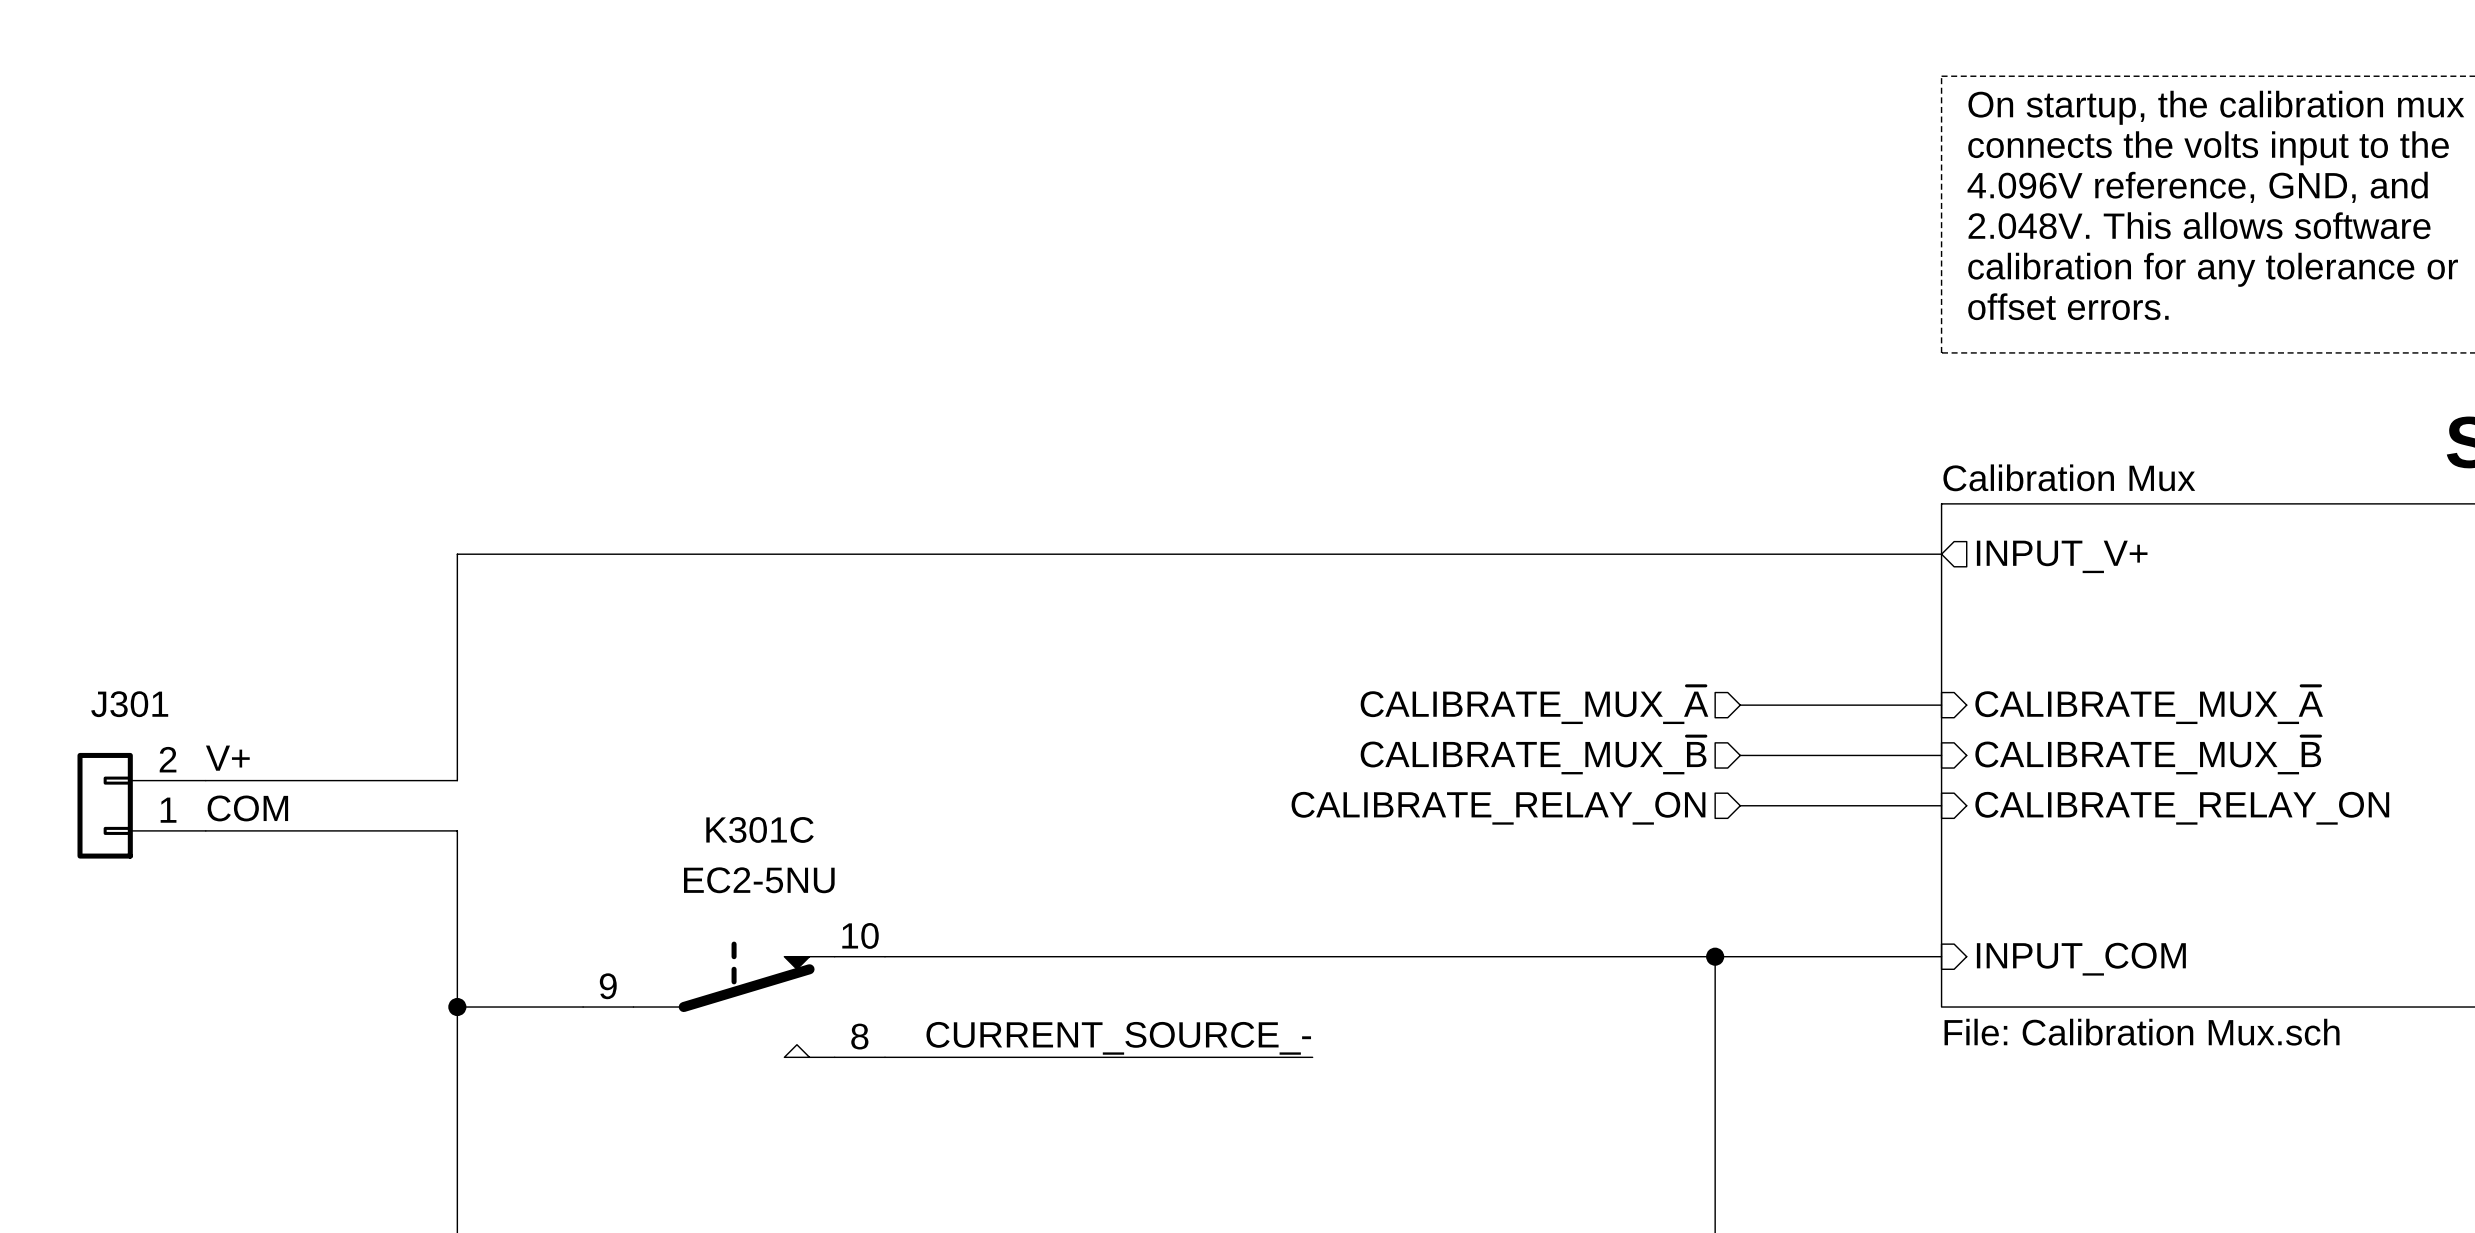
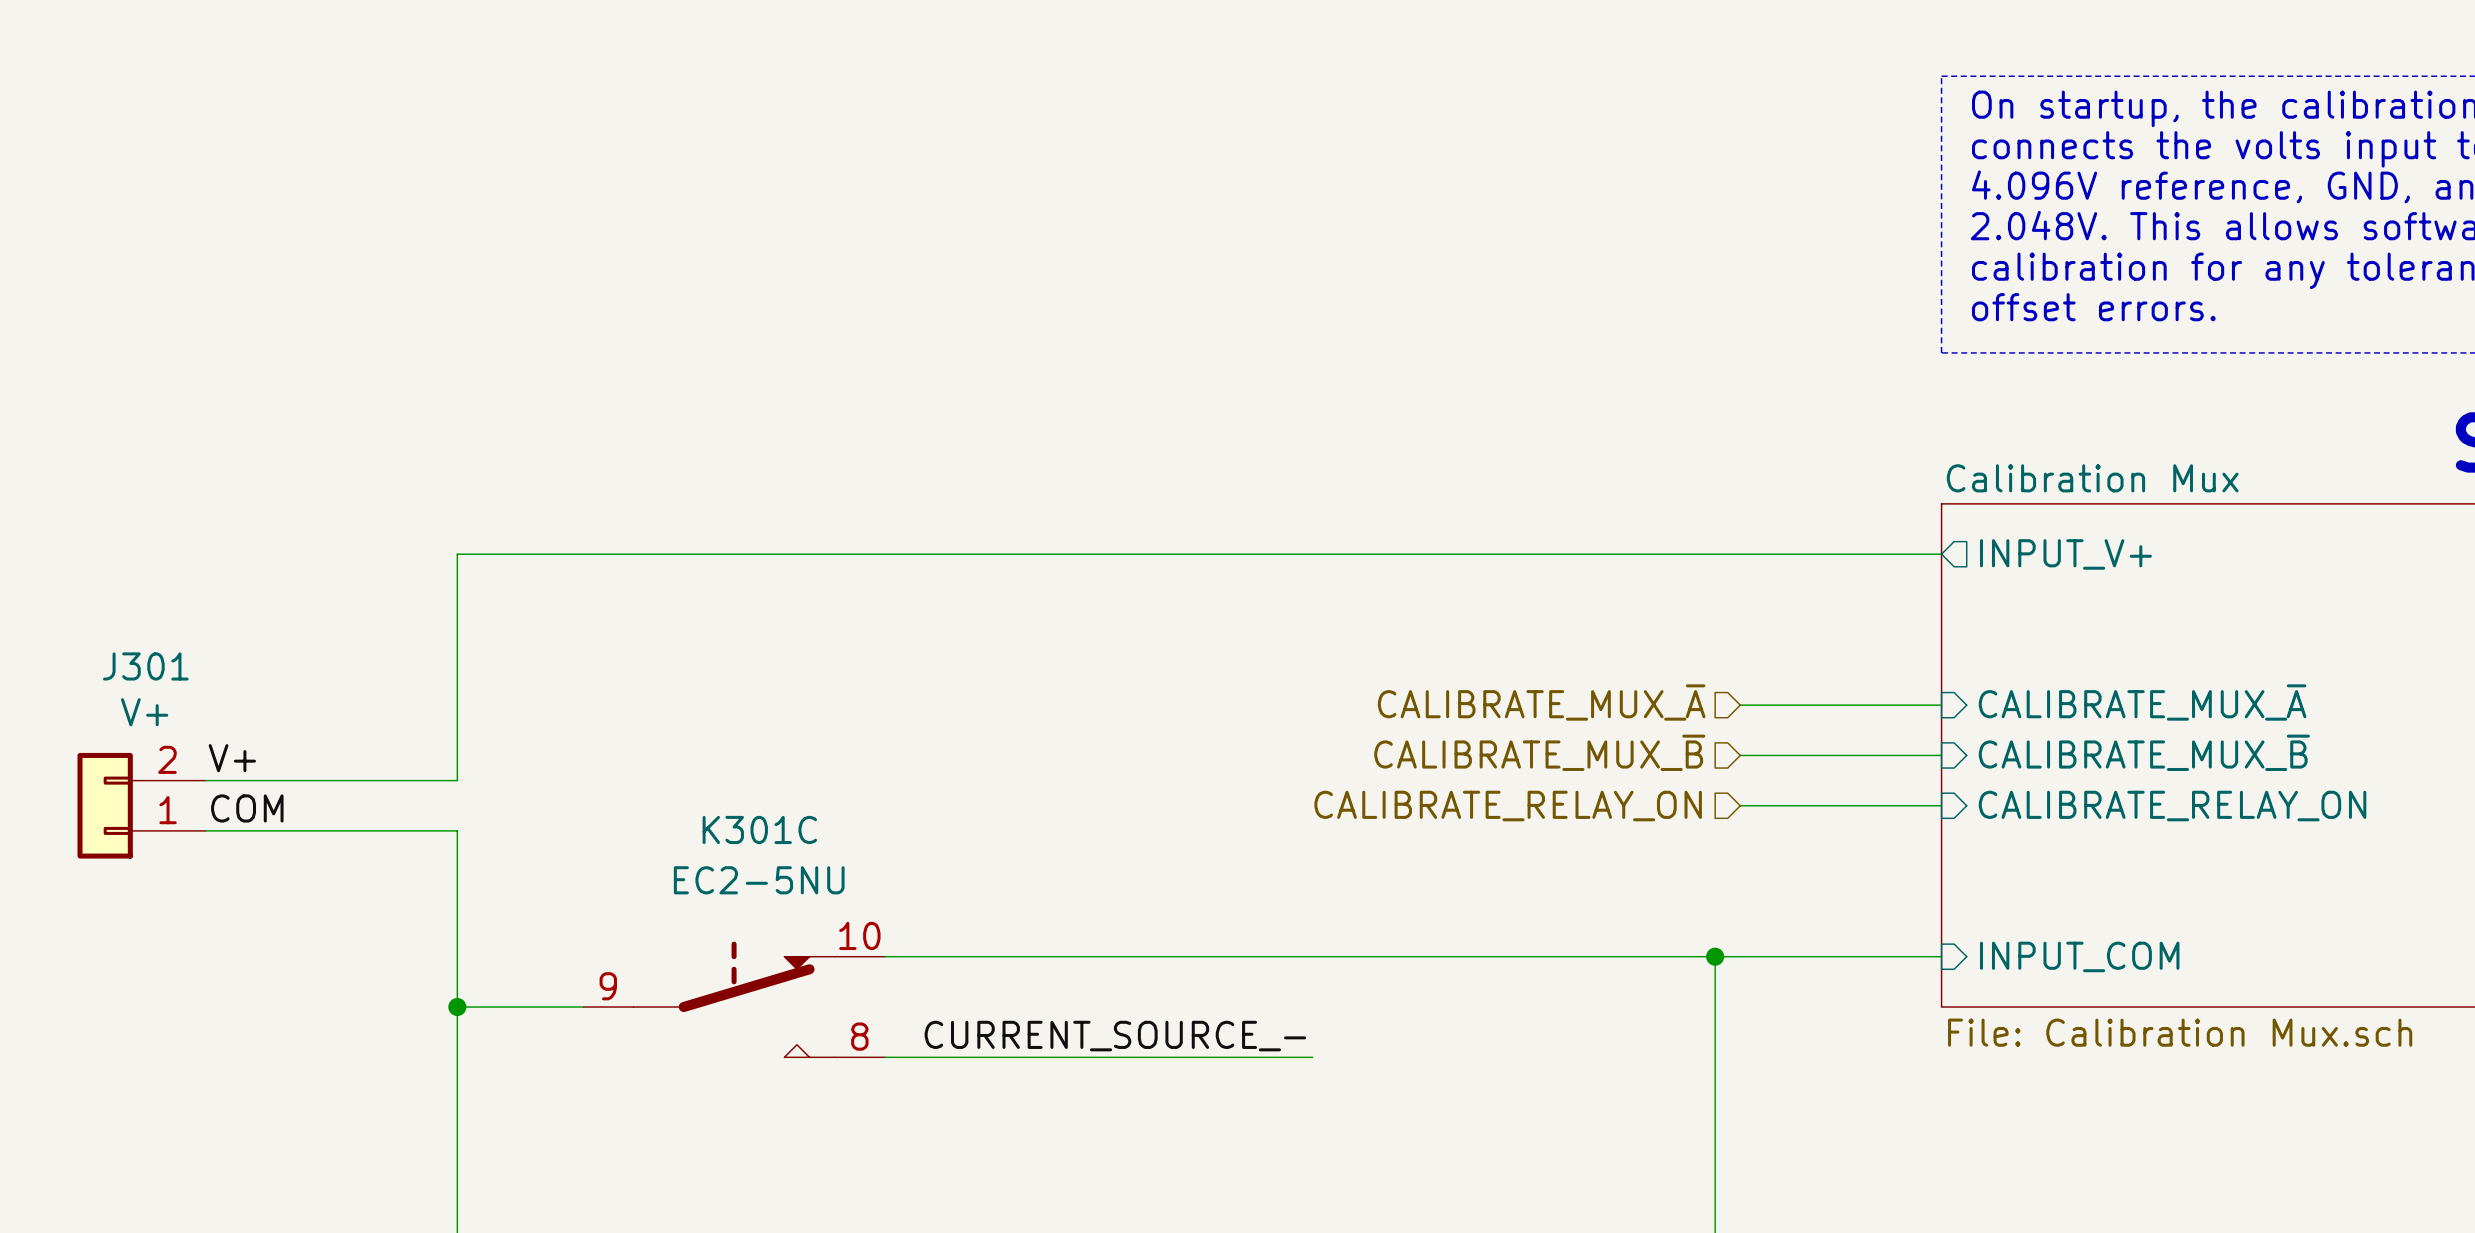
J301 name position: J301 (129, 704) -> J301 (145, 666)
J301 value: none -> V+ (144, 712)

